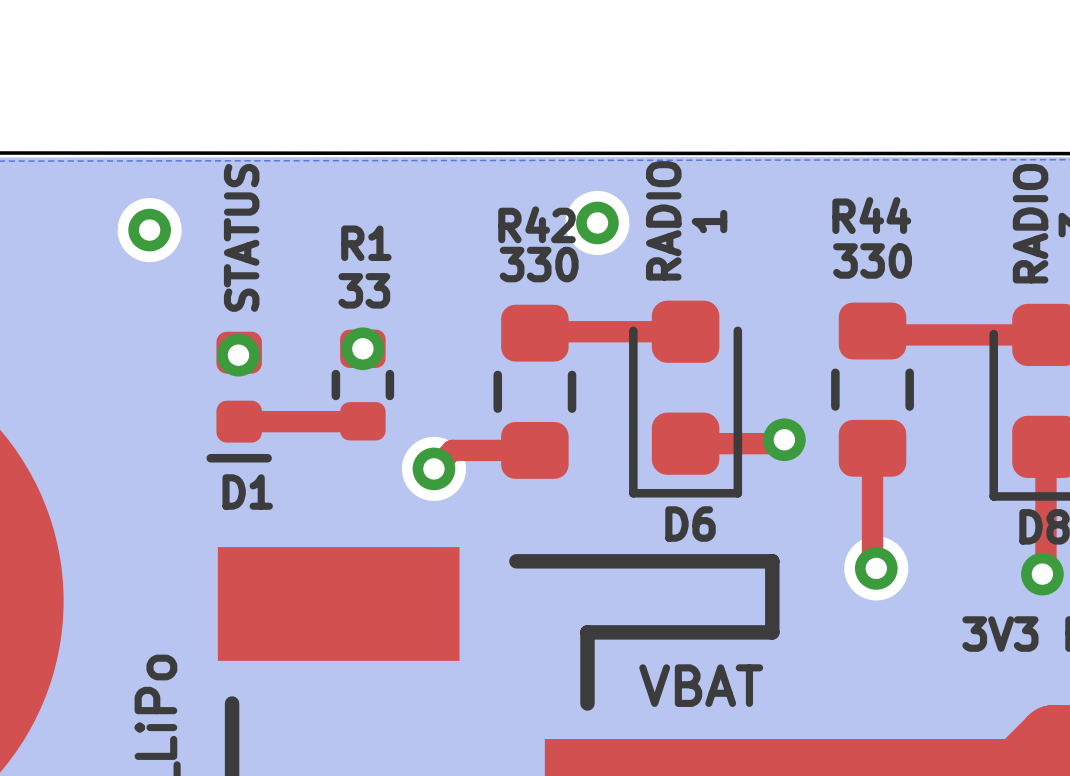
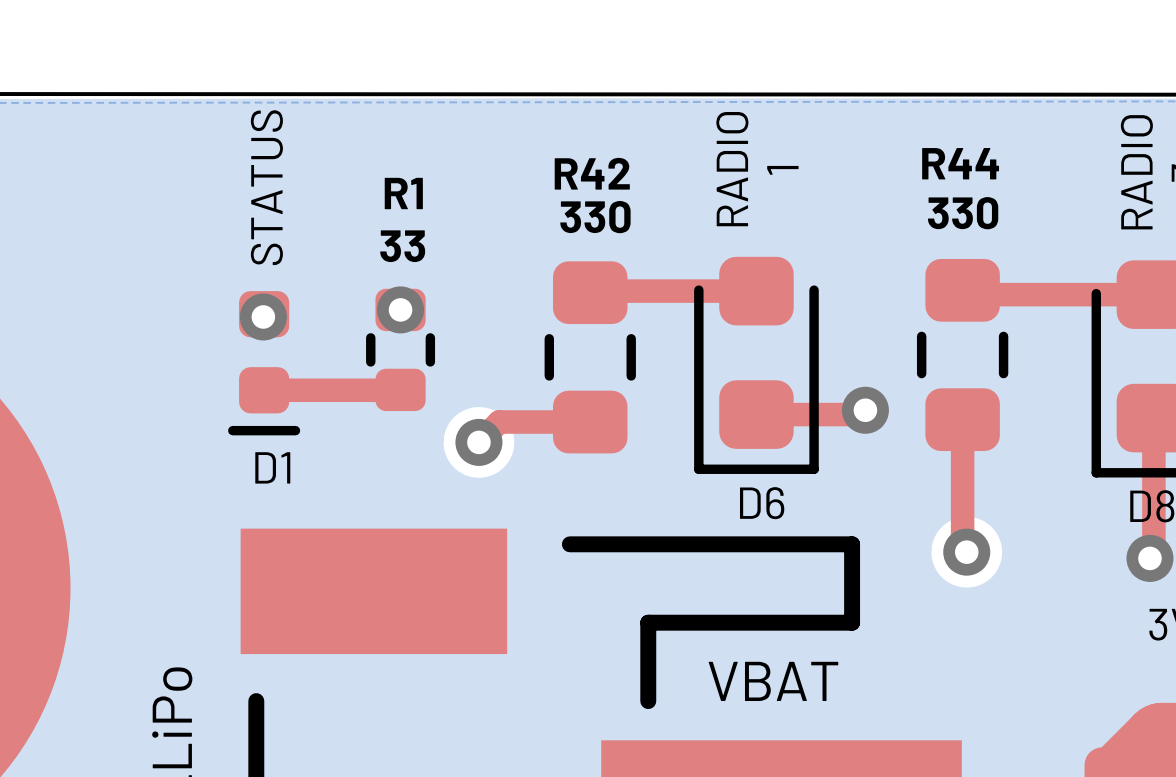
via: (597, 222) -> none
via: (149, 230) -> none

